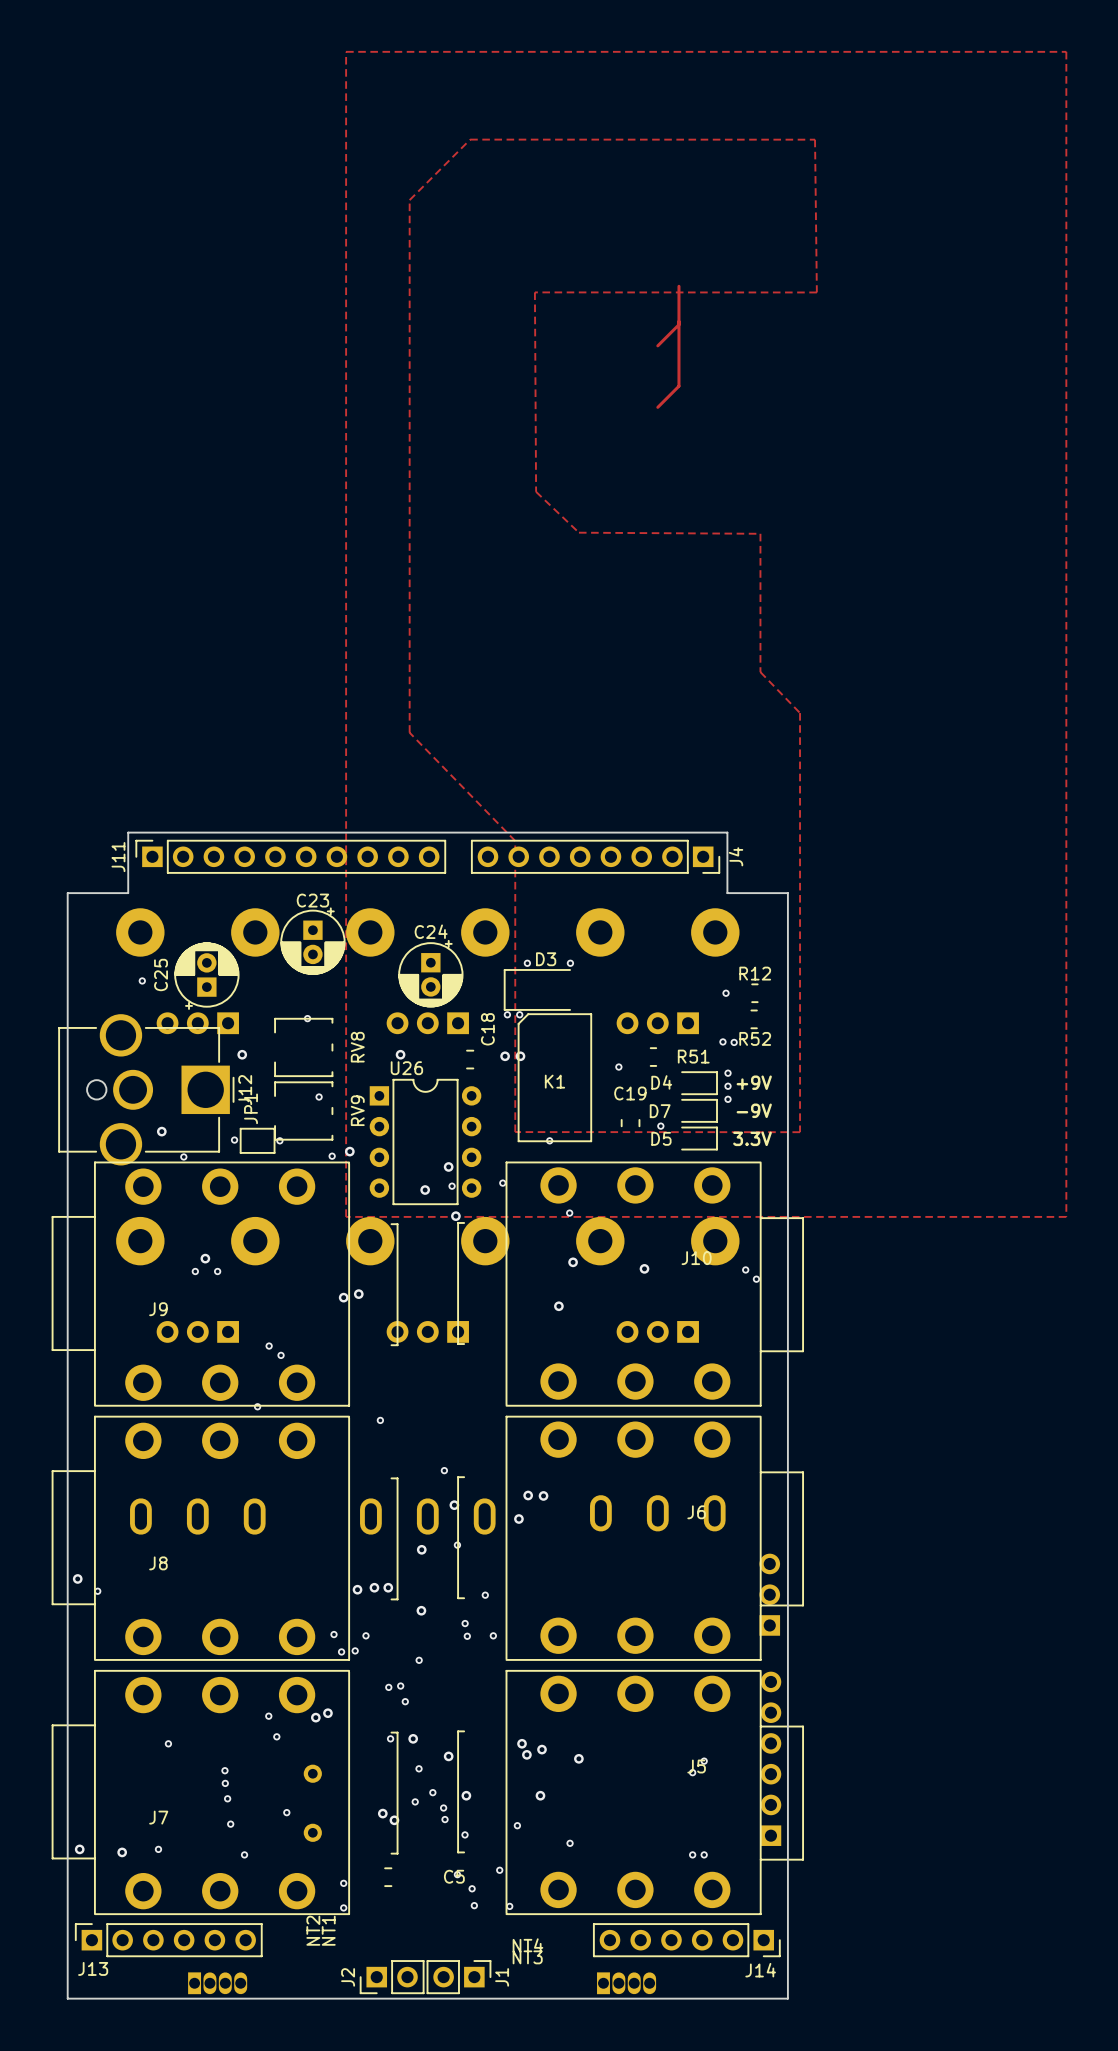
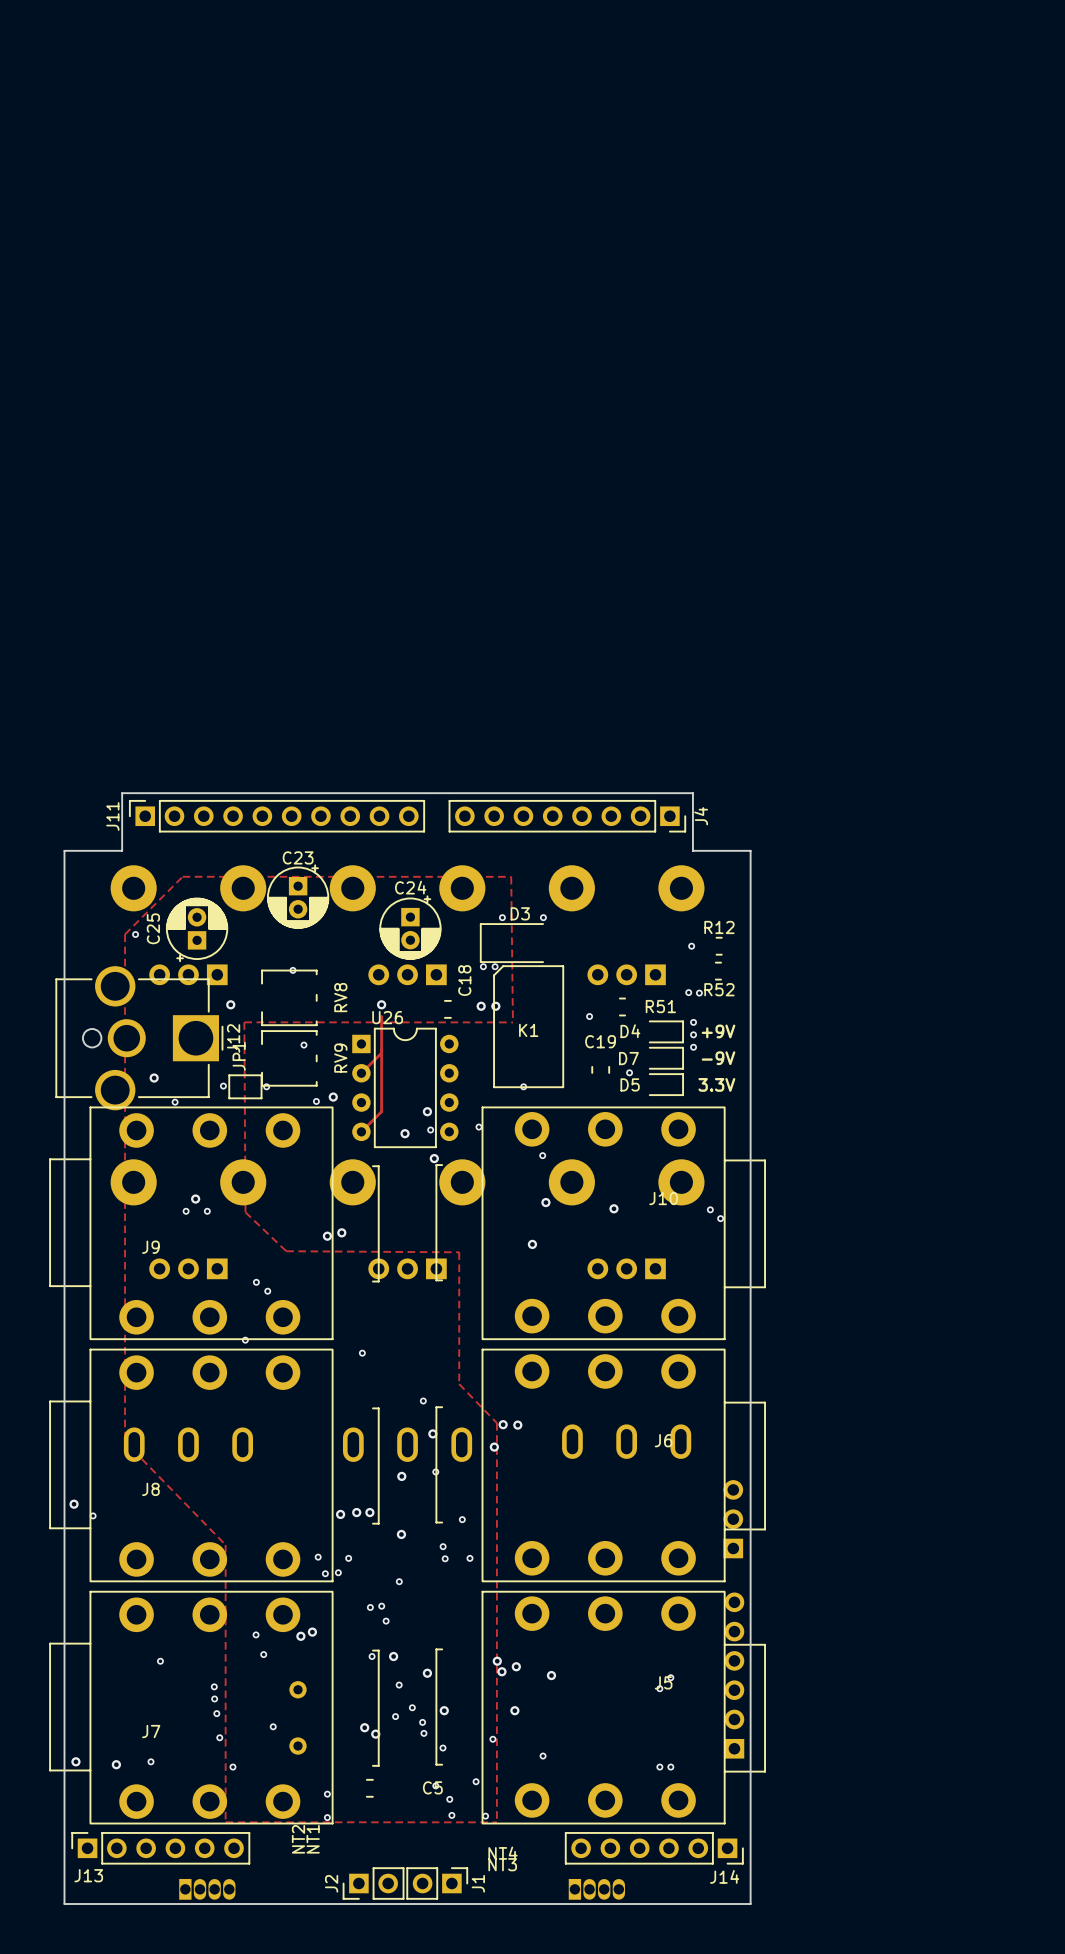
zone outline: (346, 51) (346, 1216) (1066, 1216) (1066, 51) (346, 51) -> none
zone outline: (470, 139) (409, 200) (409, 732) (515, 840) (515, 1132) (800, 1132) (800, 713) (760, 672) (760, 533) (578, 532) (536, 491) (534, 292) (816, 292) (815, 139) (470, 139) -> none
track: (678, 286) (678, 386) (657, 407) -> none
track: (678, 324) (657, 345) -> none
zone outline: none -> (182, 876) (125, 934) (125, 1441) (225, 1544) (225, 1822) (496, 1822) (496, 1423) (459, 1384) (459, 1252) (286, 1251) (245, 1212) (244, 1022) (512, 1022) (511, 876) (182, 876)
track: none -> (381, 1016) (381, 1111) (361, 1131)
track: none -> (381, 1053) (361, 1073)

